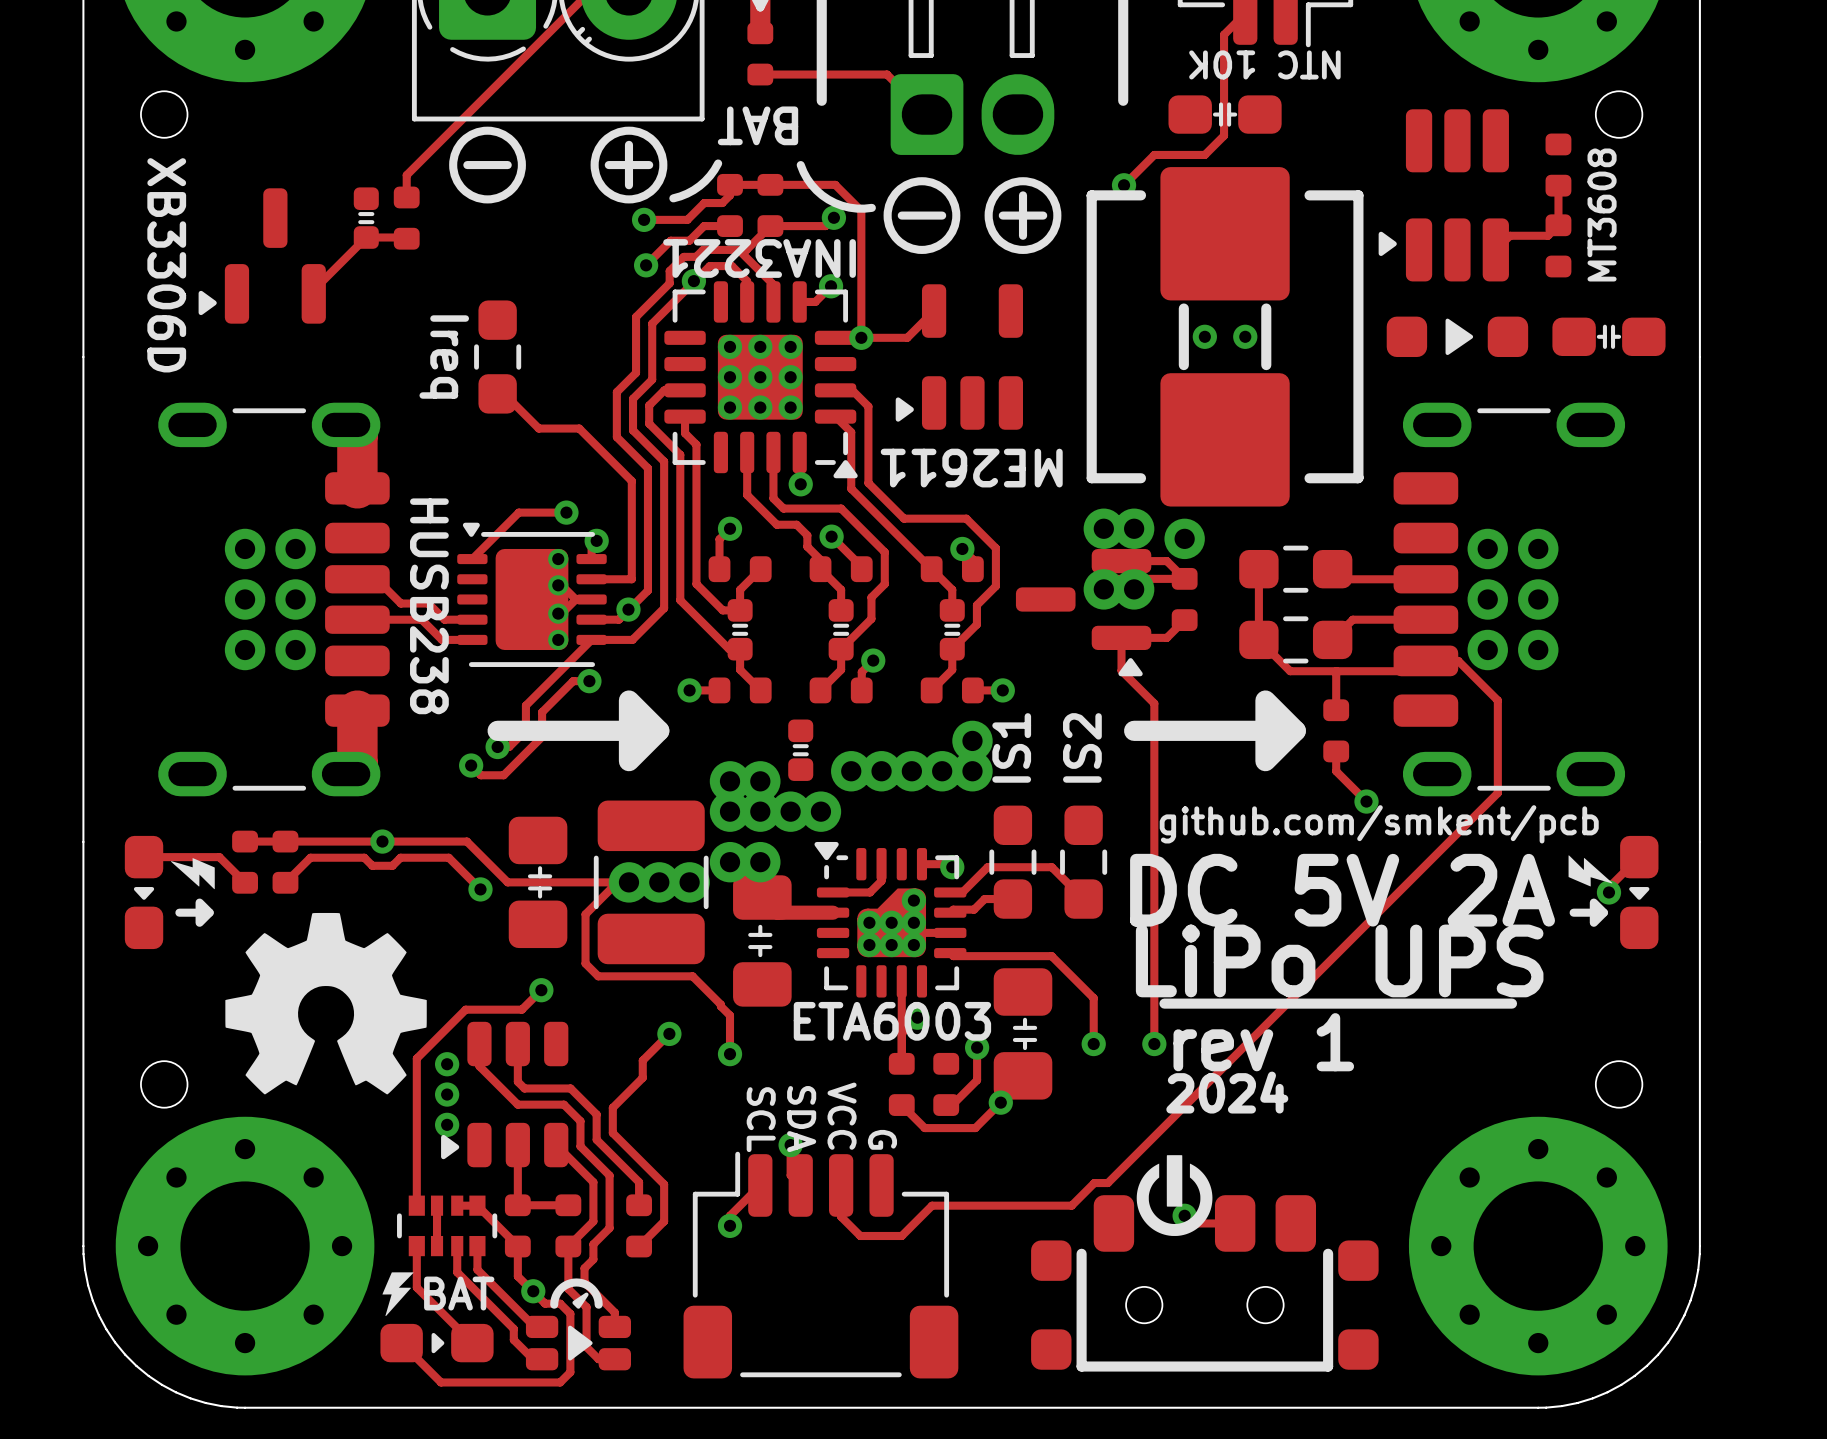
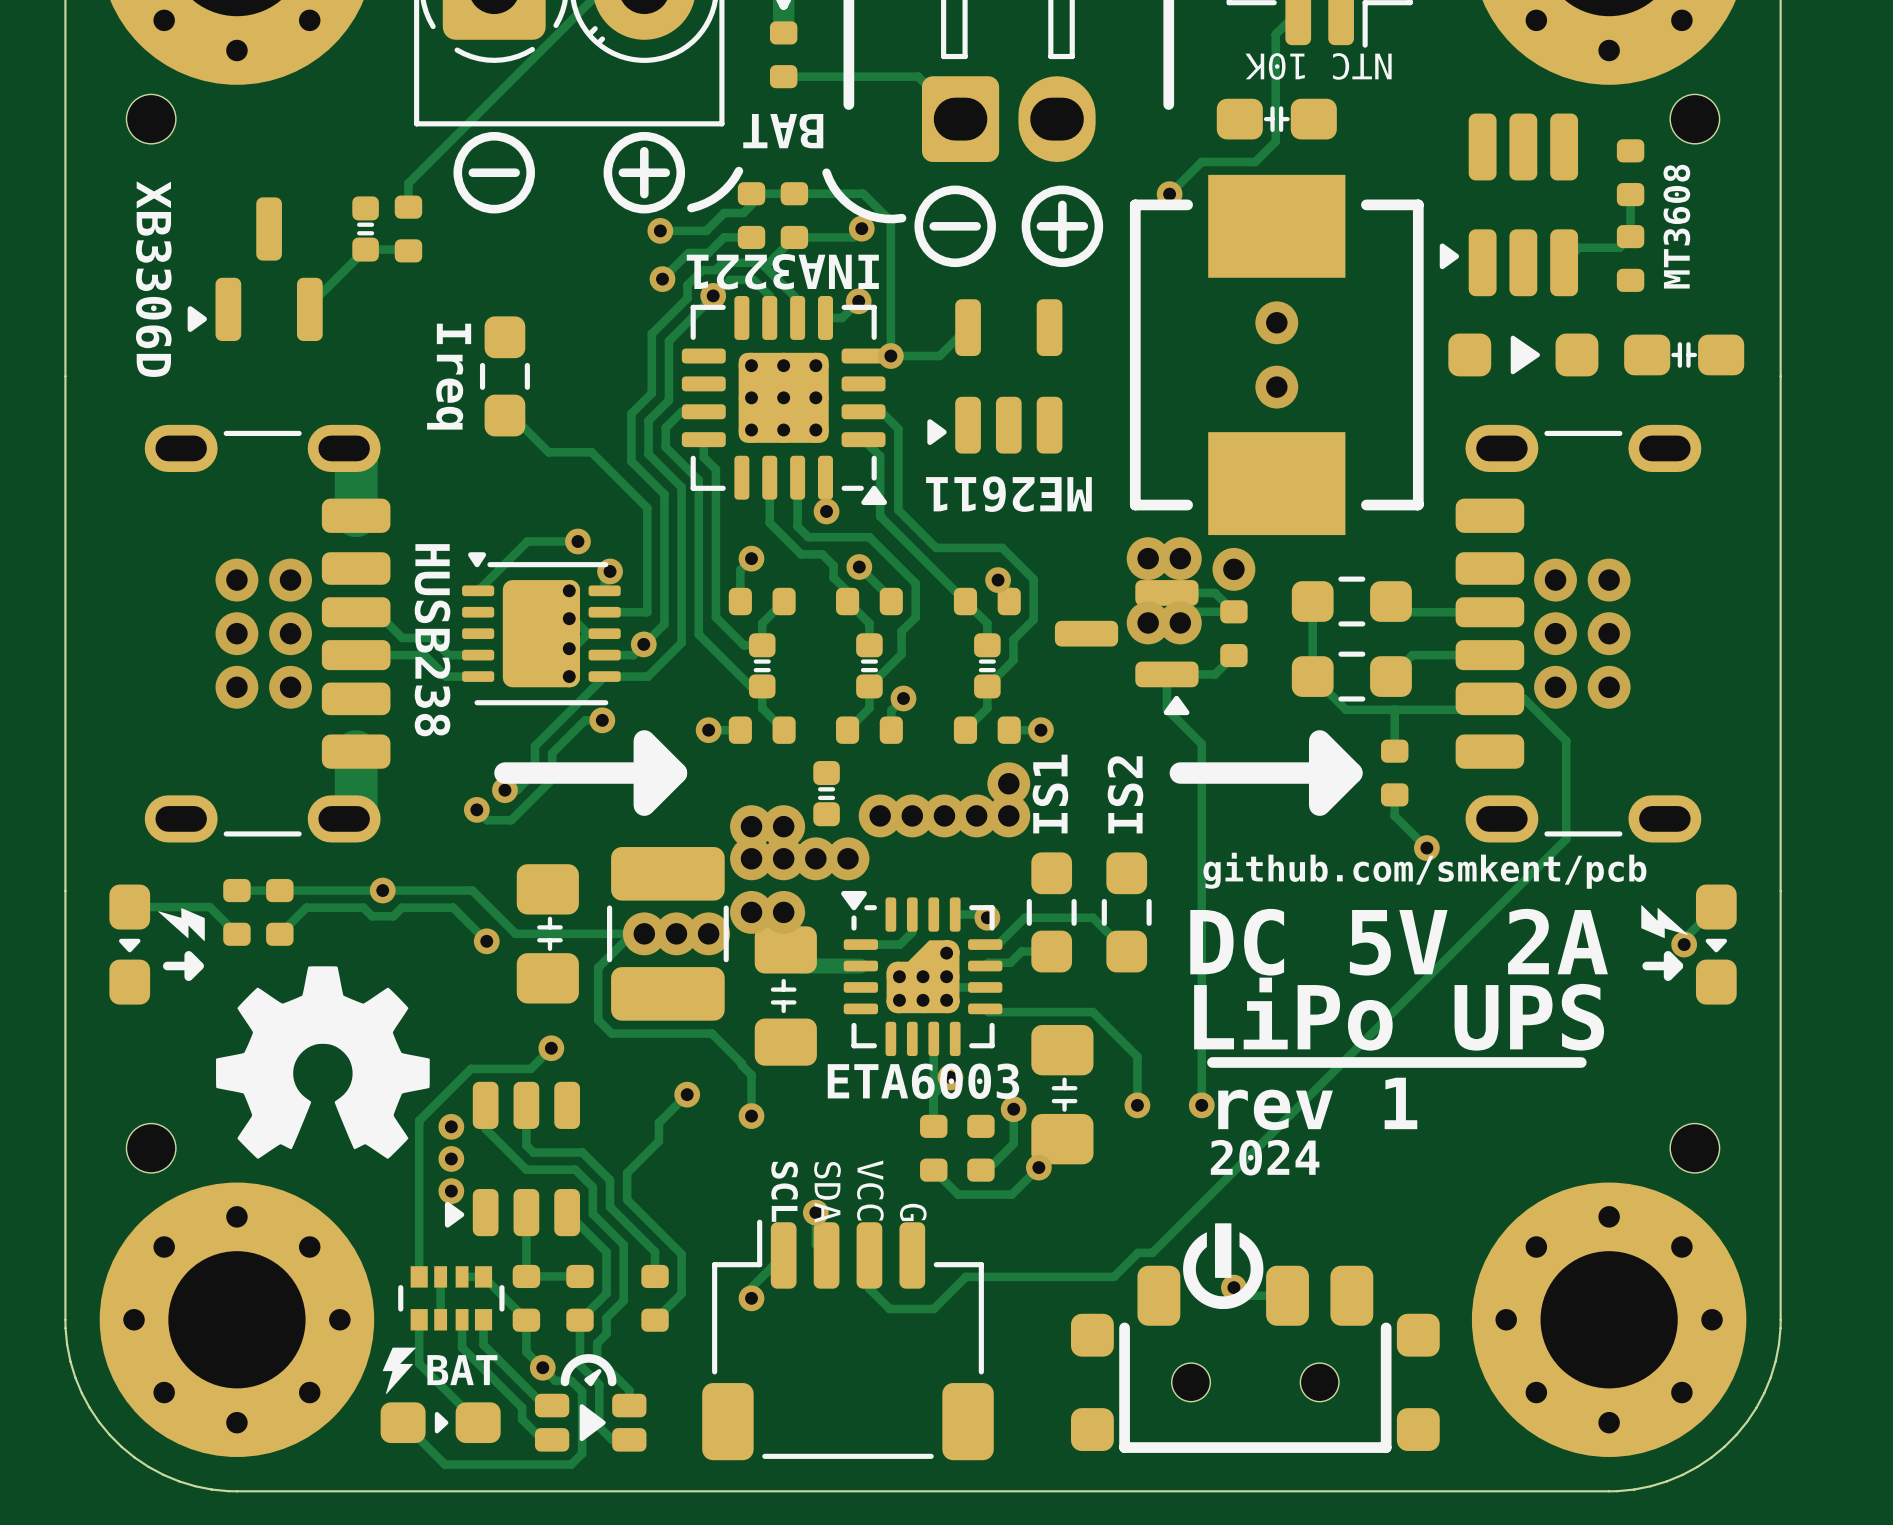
part footprint: [1086, 167, 1364, 507] -> [1129, 174, 1424, 536]
via: none -> (1276, 322)
via: (1204, 336) -> none
via: (1245, 336) -> none
via: none -> (1276, 387)

